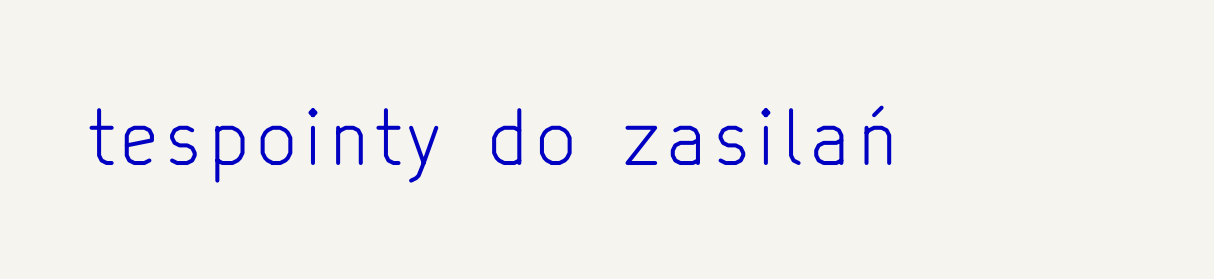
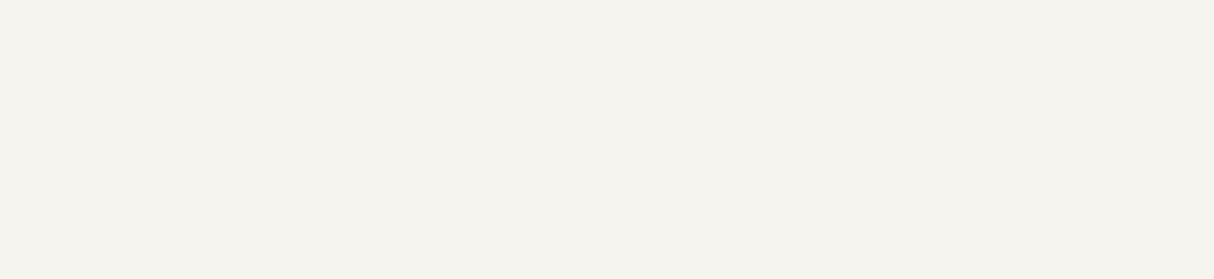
text: tespointy do zasilań (490, 144) -> none

